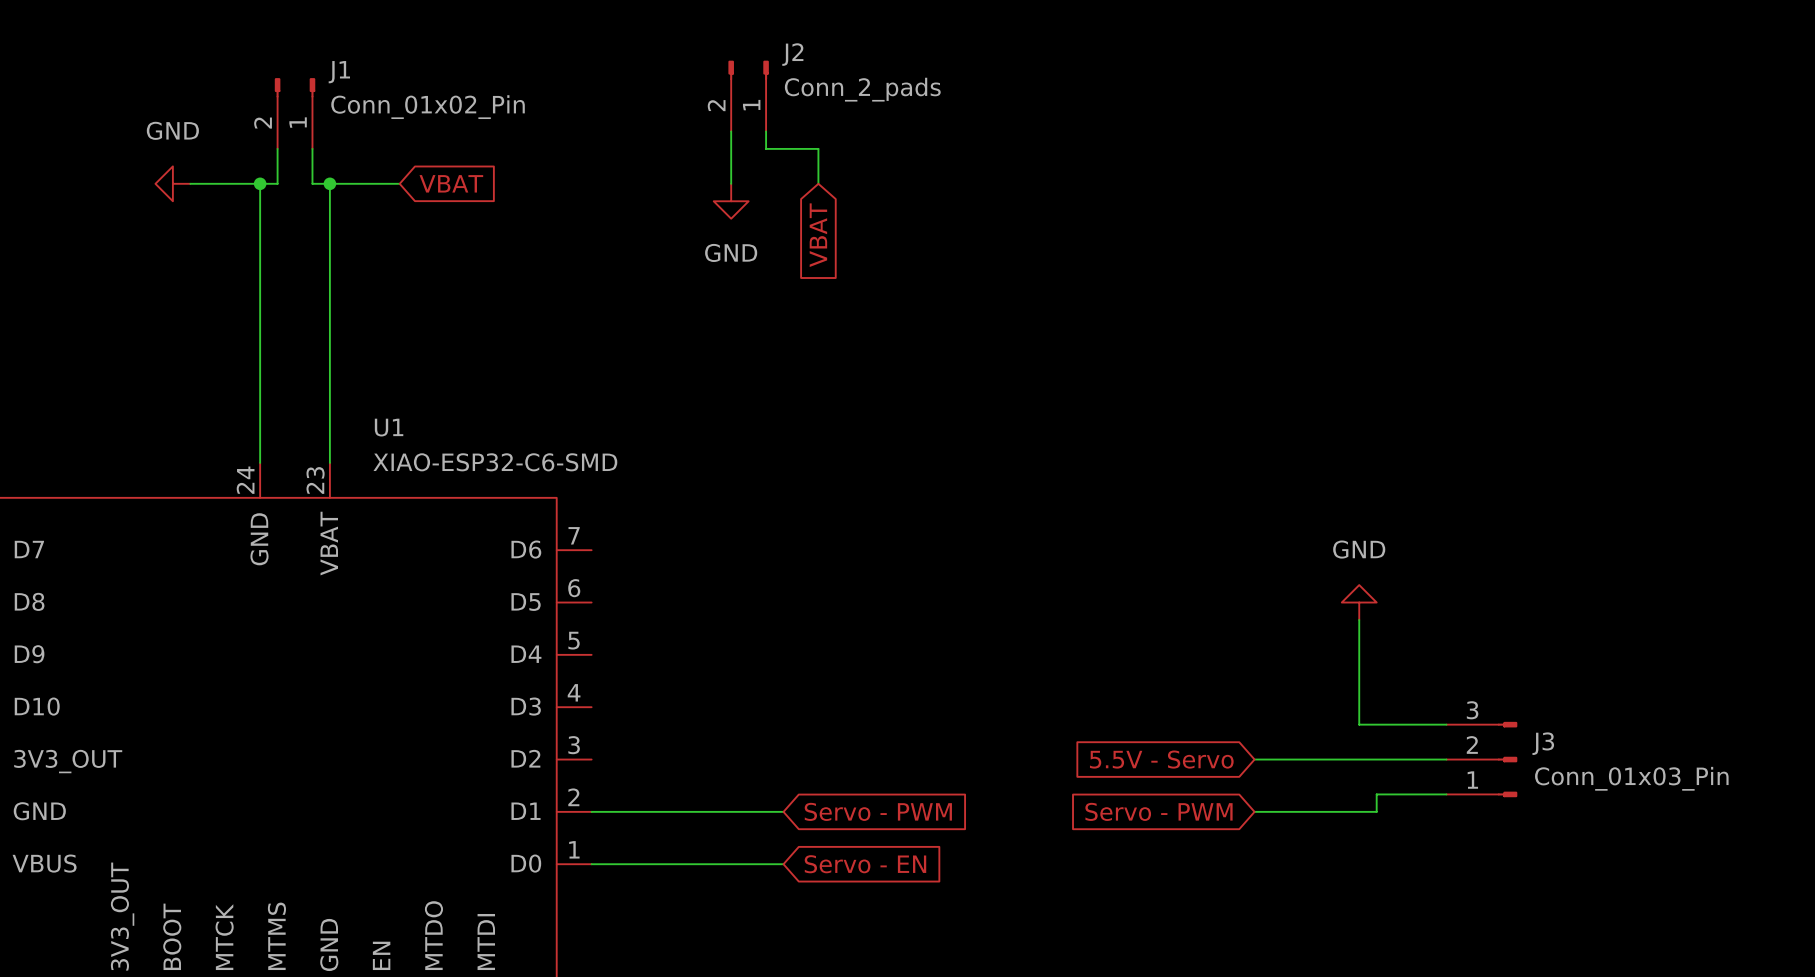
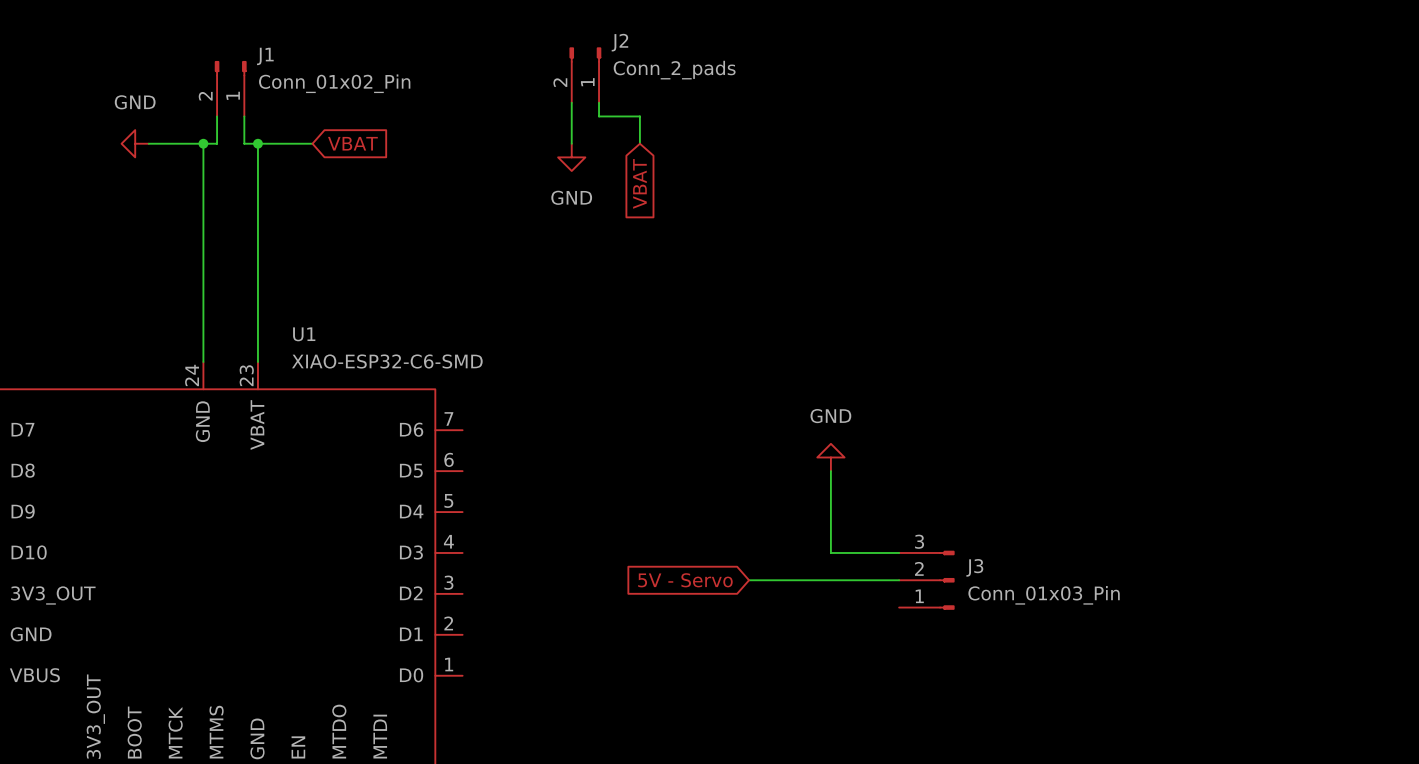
power symbol position: GND (1359, 602) -> GND (830, 457)
wire: (1359, 619) (1359, 724) (1446, 724) -> (830, 471) (830, 552) (899, 552)
global label: none -> 5V - Servo (685, 580)
global label: 5.5V - Servo (1161, 759) -> none
wire: (1254, 759) (1446, 759) -> (749, 580) (899, 580)
J3 position: (1481, 759) -> (926, 580)
wire: (1446, 794) (1376, 794) (1376, 811) (1254, 811) -> none
wire: (591, 811) (783, 811) -> none
global label: Servo - PWM (878, 811) -> none
global label: Servo - PWM (1158, 811) -> none
wire: (591, 864) (783, 864) -> none
global label: Servo - EN (865, 864) -> none

